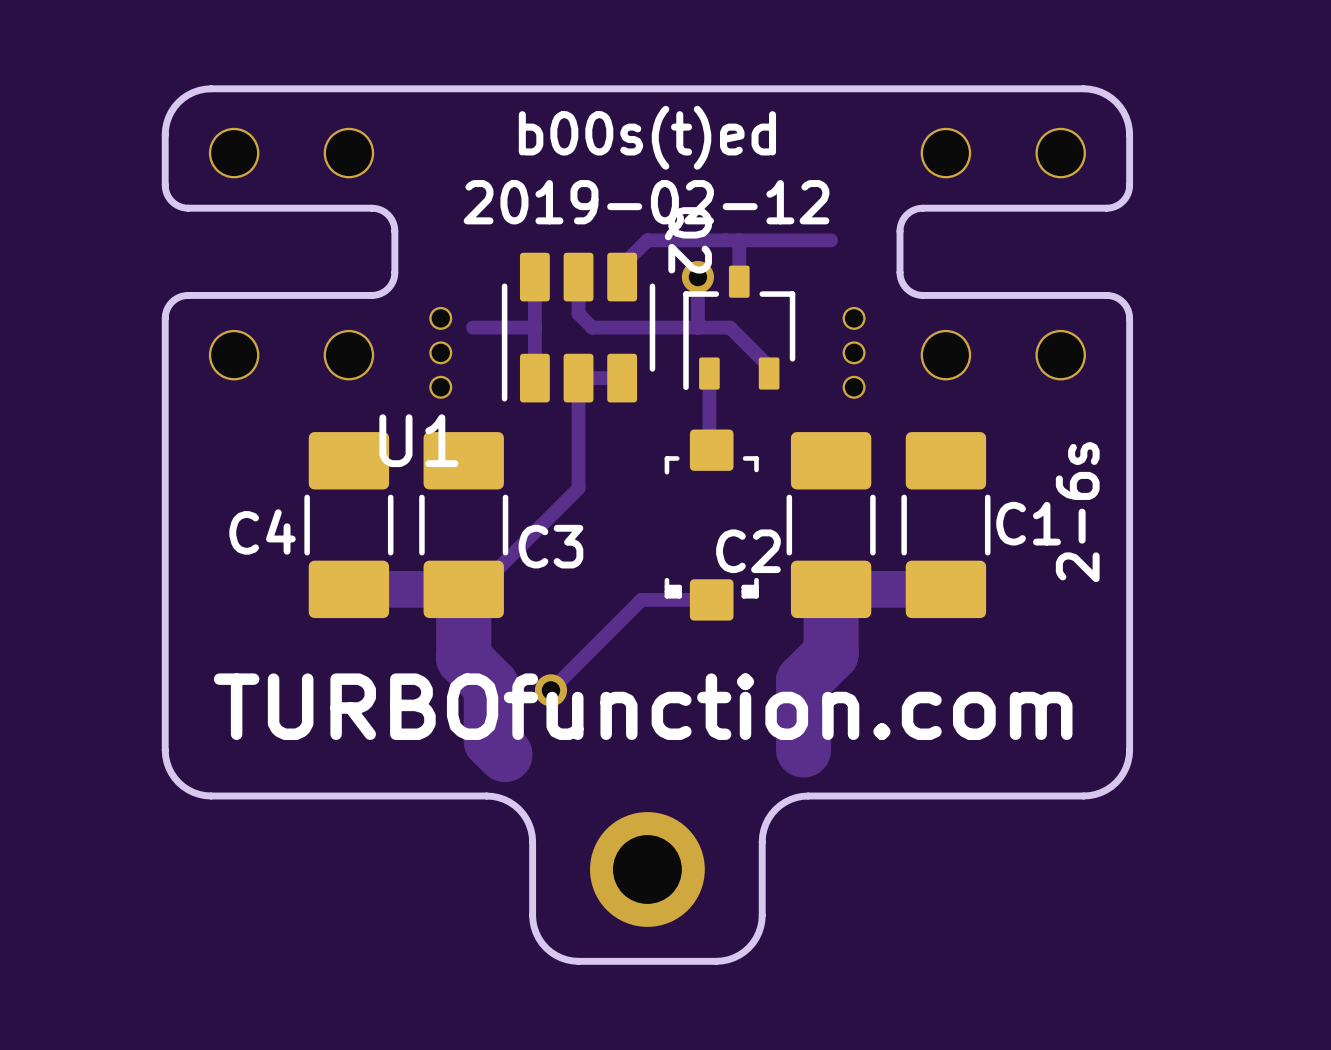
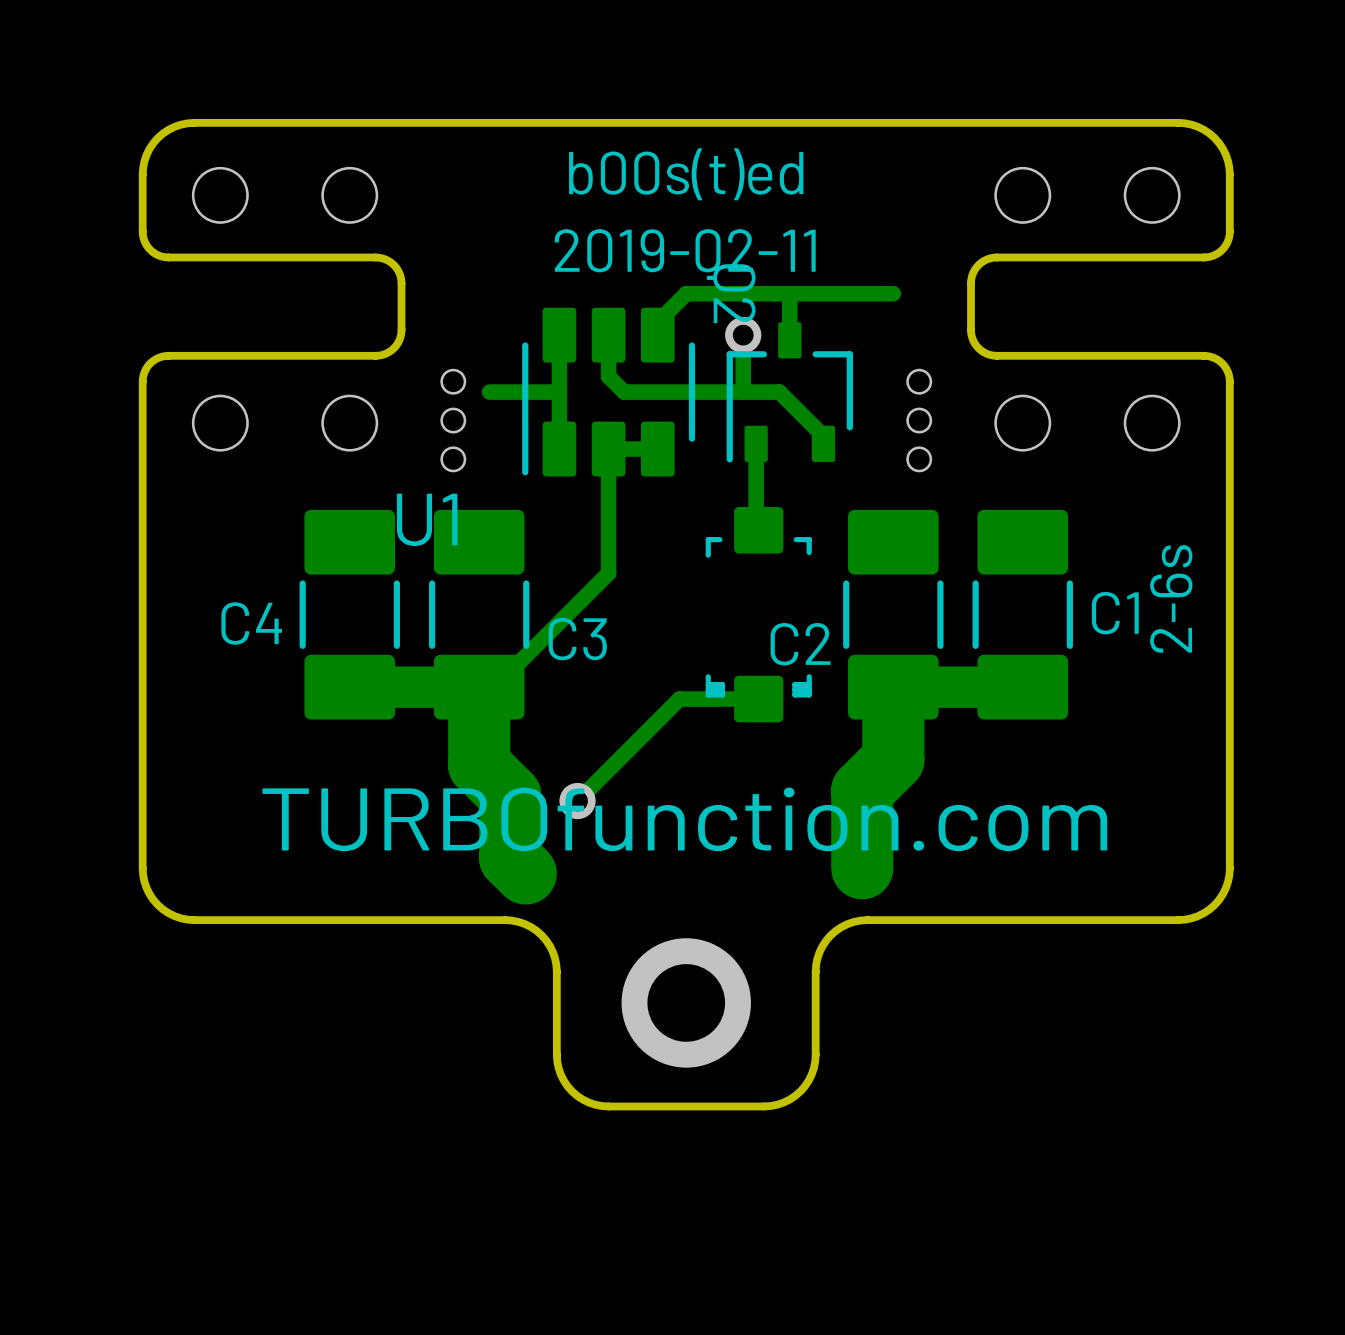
text: 2019-02-12 (646, 202) -> 2019-02-11 (685, 250)

